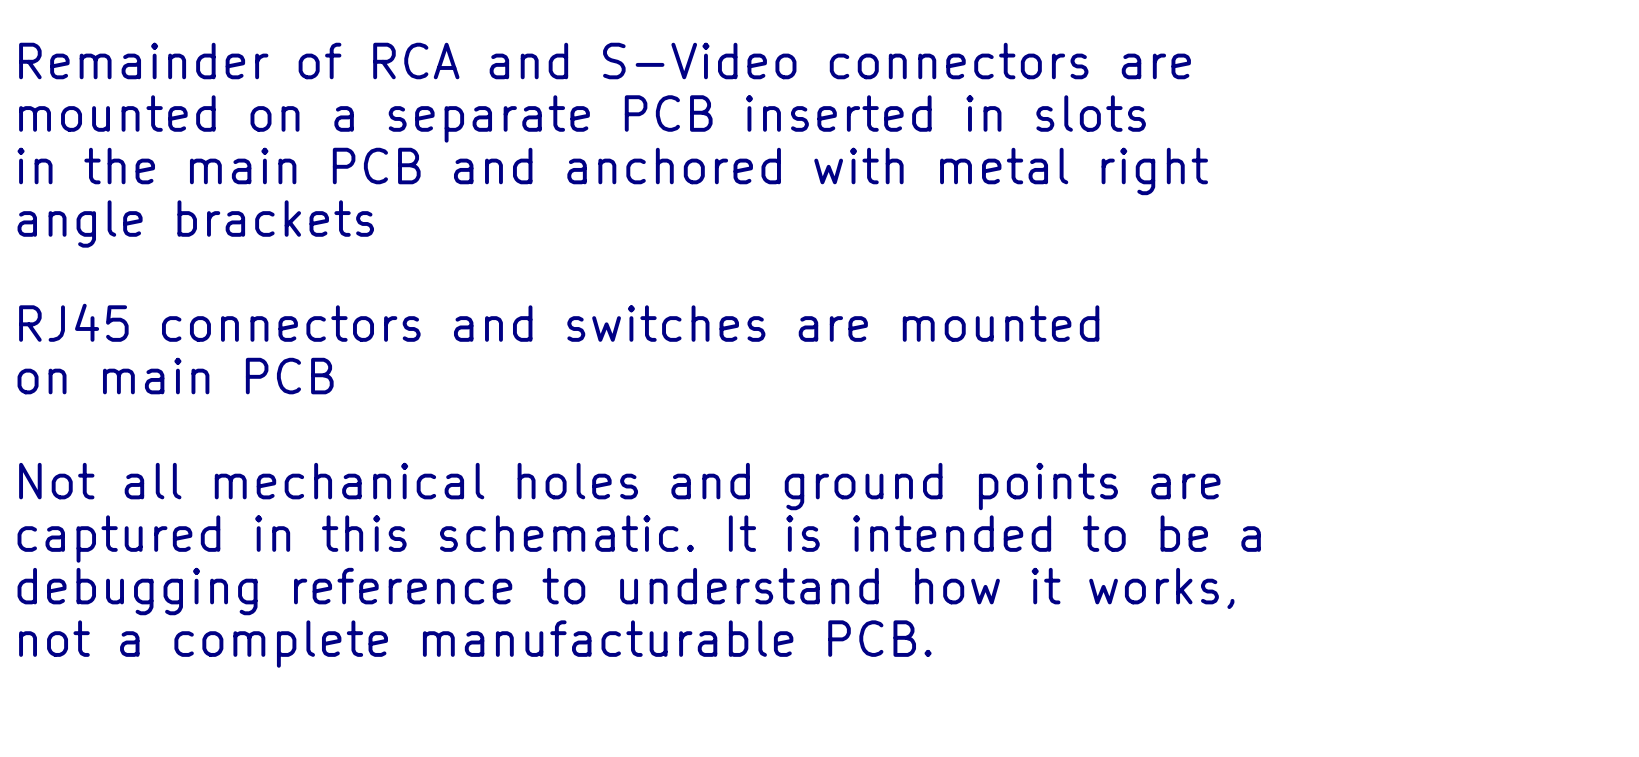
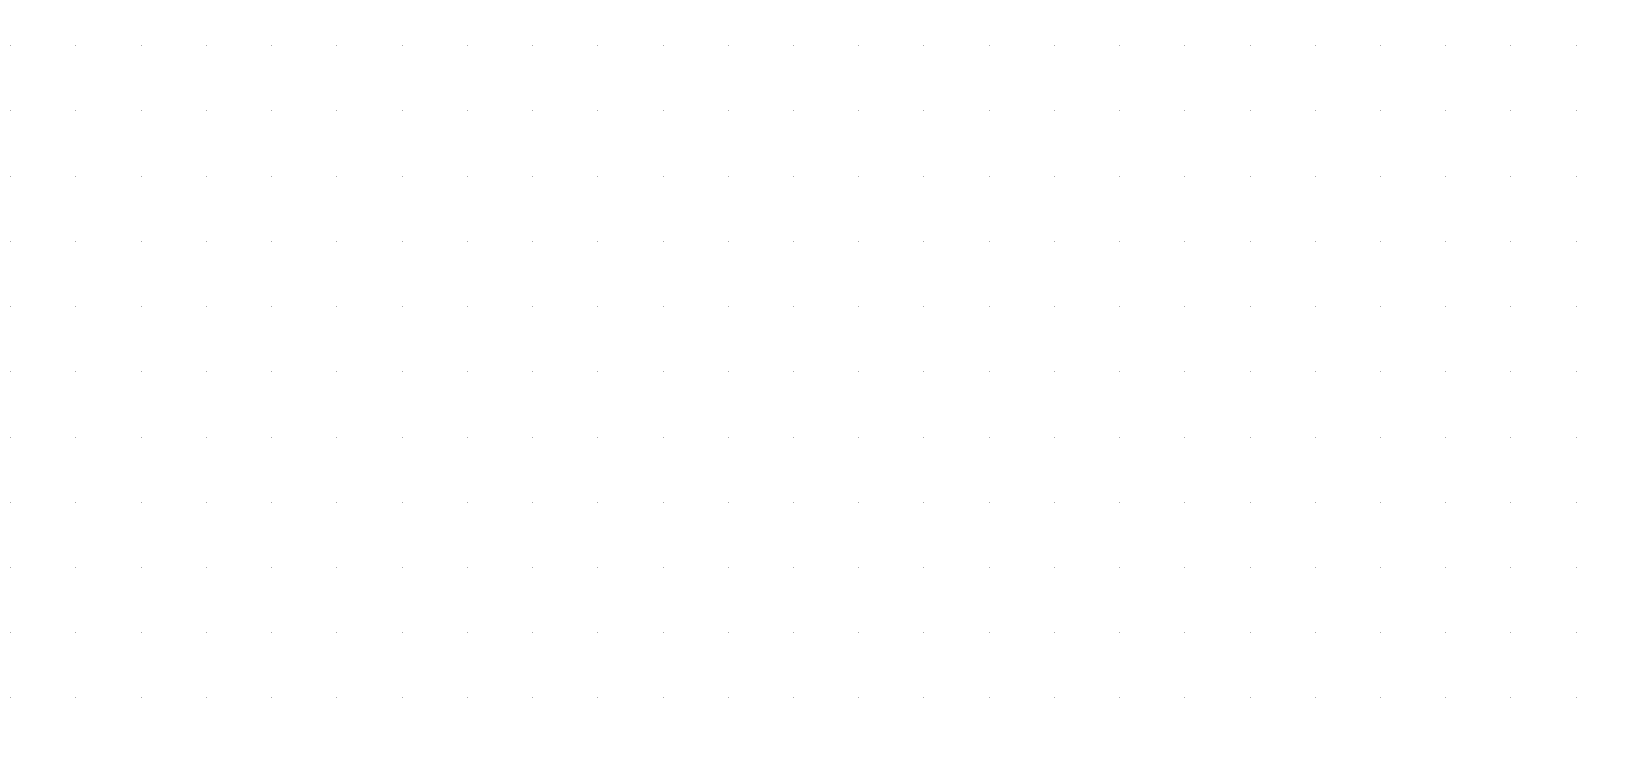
text: Remainder of RCA and S-Video connectors are (605, 61) -> none
text: mounted on a separate PCB inserted in slots (582, 118) -> none
text: in the main PCB and anchored with metal right (612, 171) -> none
text: angle brackets (195, 223) -> none
text: RJ45 connectors and switches are mounted (559, 322) -> none
text: on main PCB (175, 376) -> none
text: Not all mechanical holes and ground points are (619, 486) -> none
text: captured in this schematic. It is intended to be a (639, 539) -> none
text: debugging reference to understand how it works, (625, 591) -> none
text: not a complete manufacturable PCB. (475, 644) -> none

